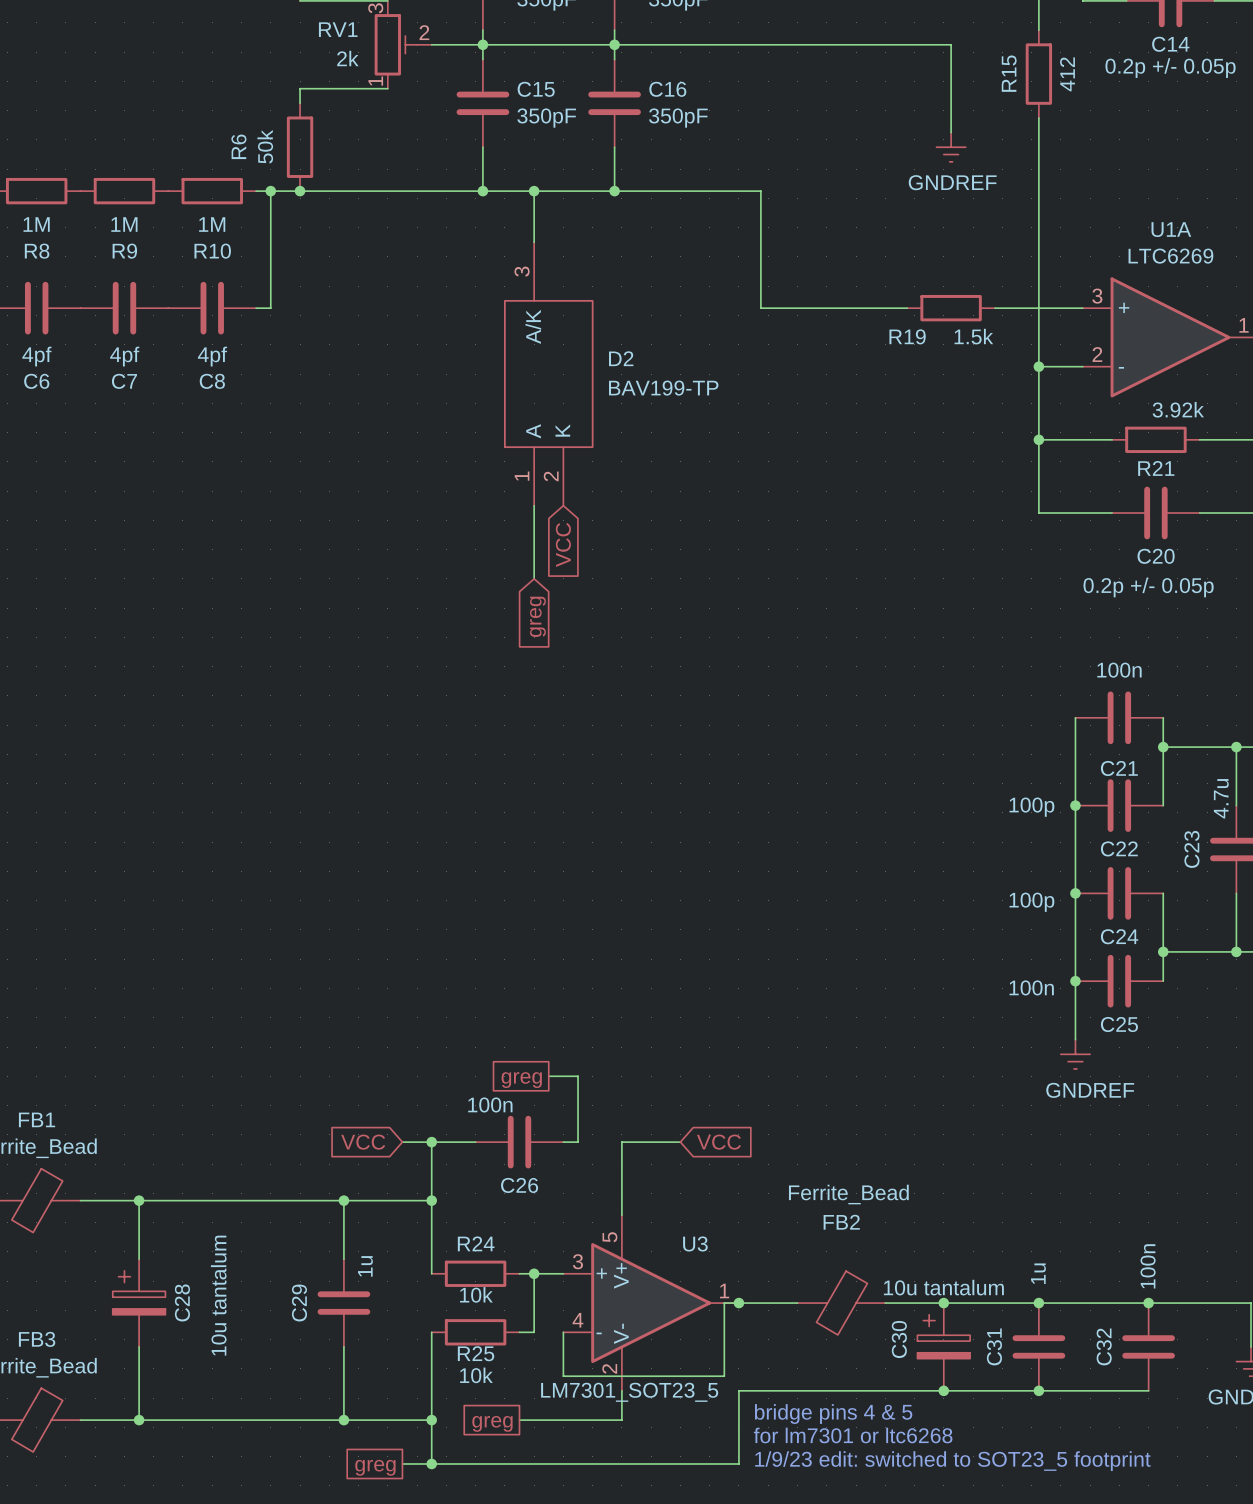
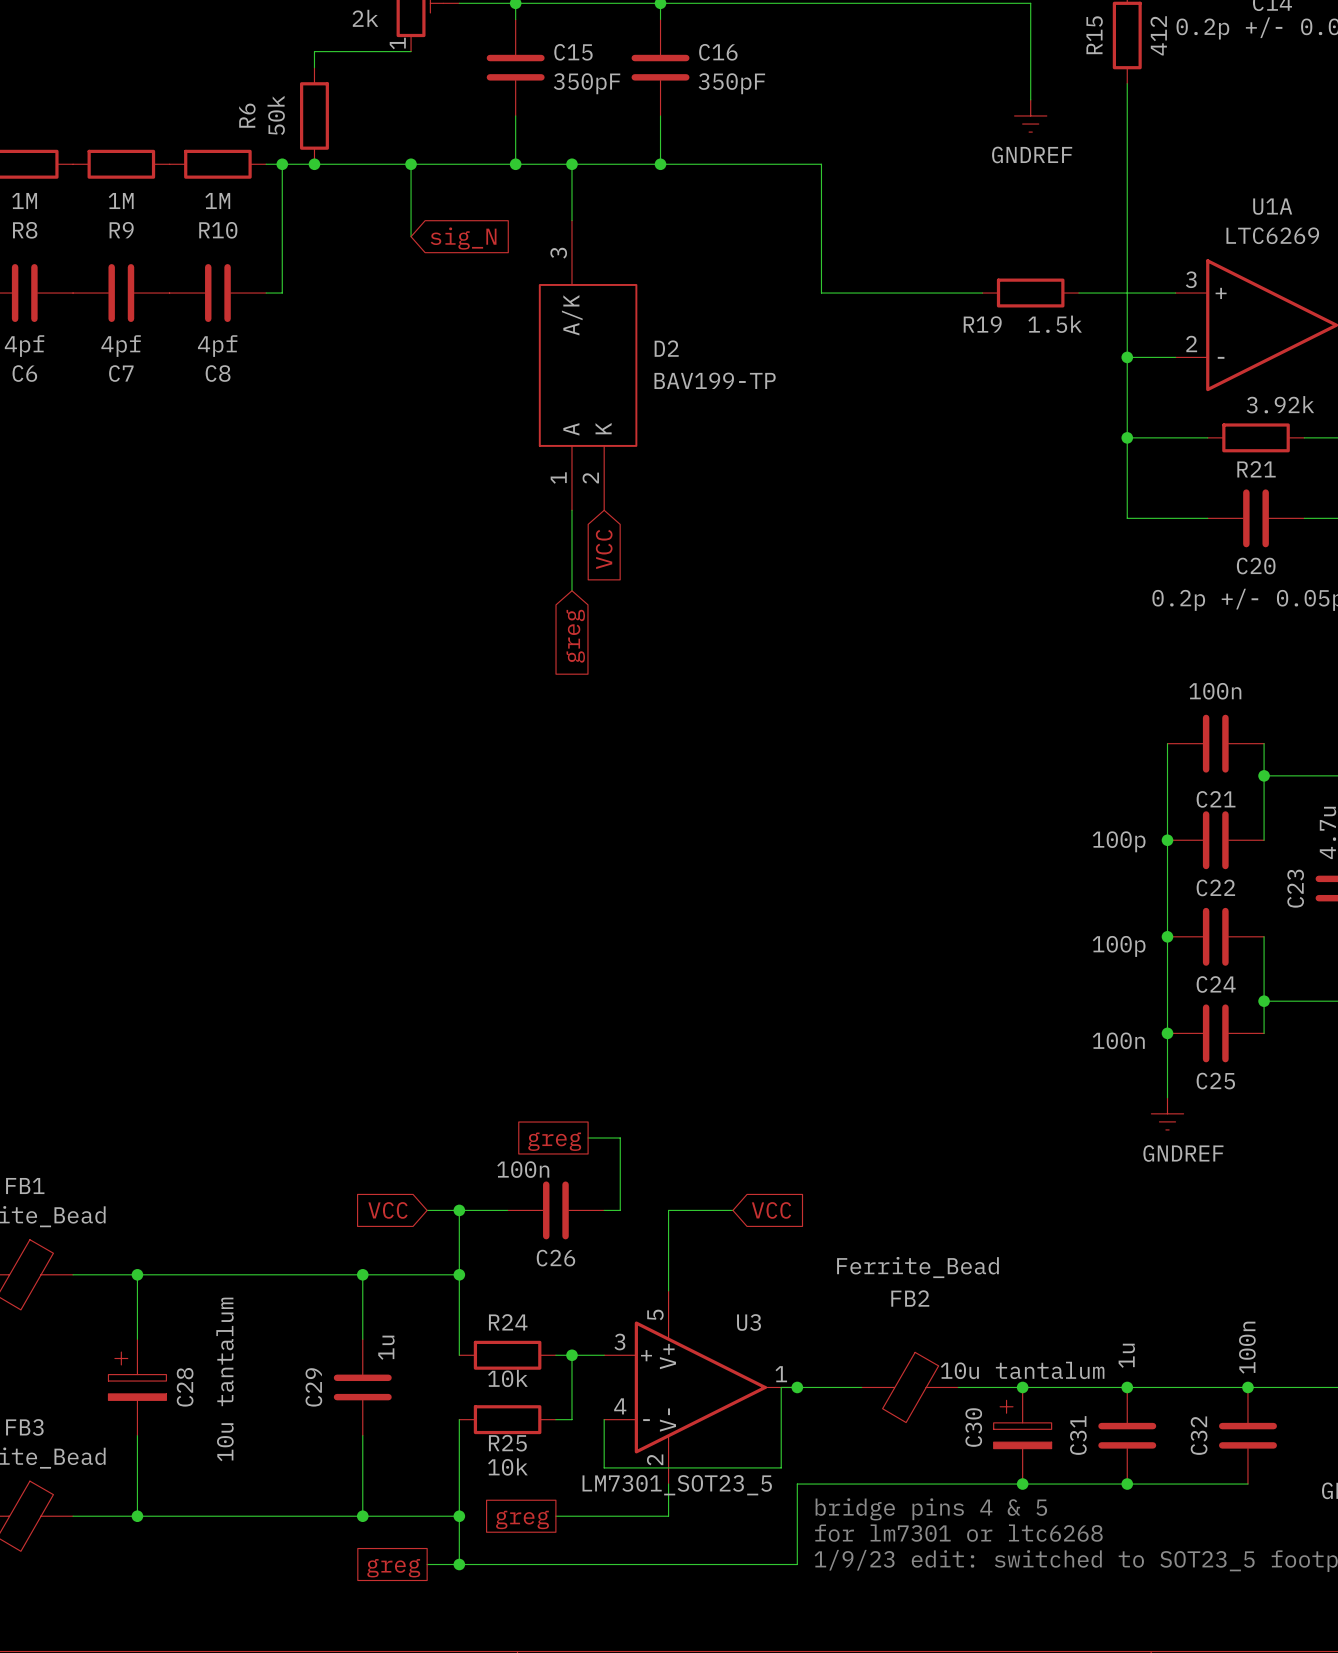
wire: none -> (411, 164) (411, 236)
junction: none -> (411, 164)
global label: none -> sig_N (463, 238)

